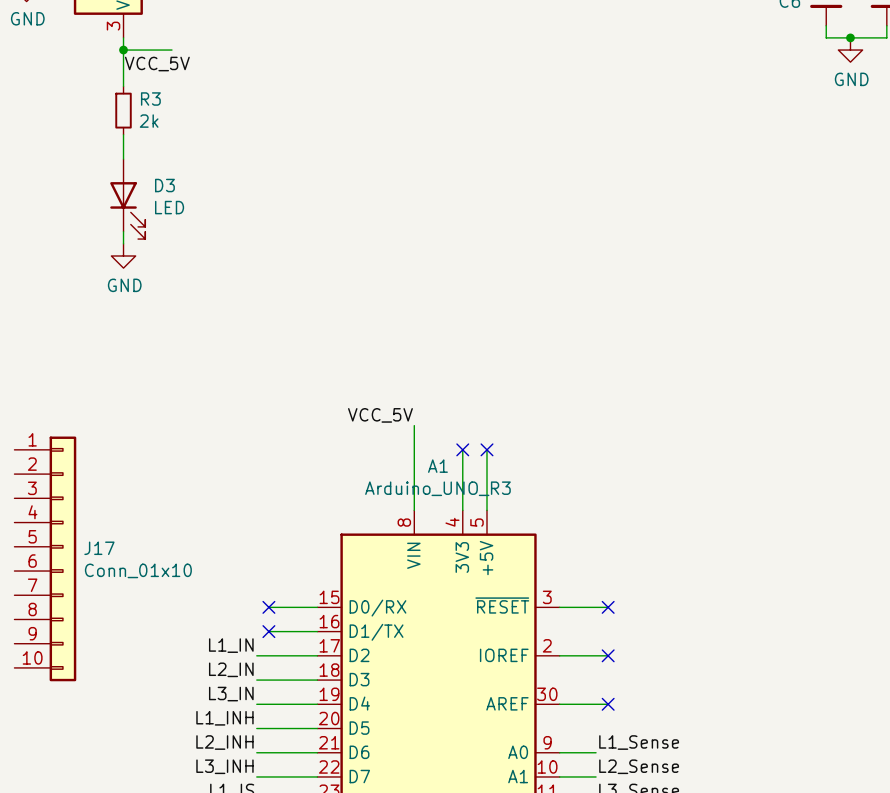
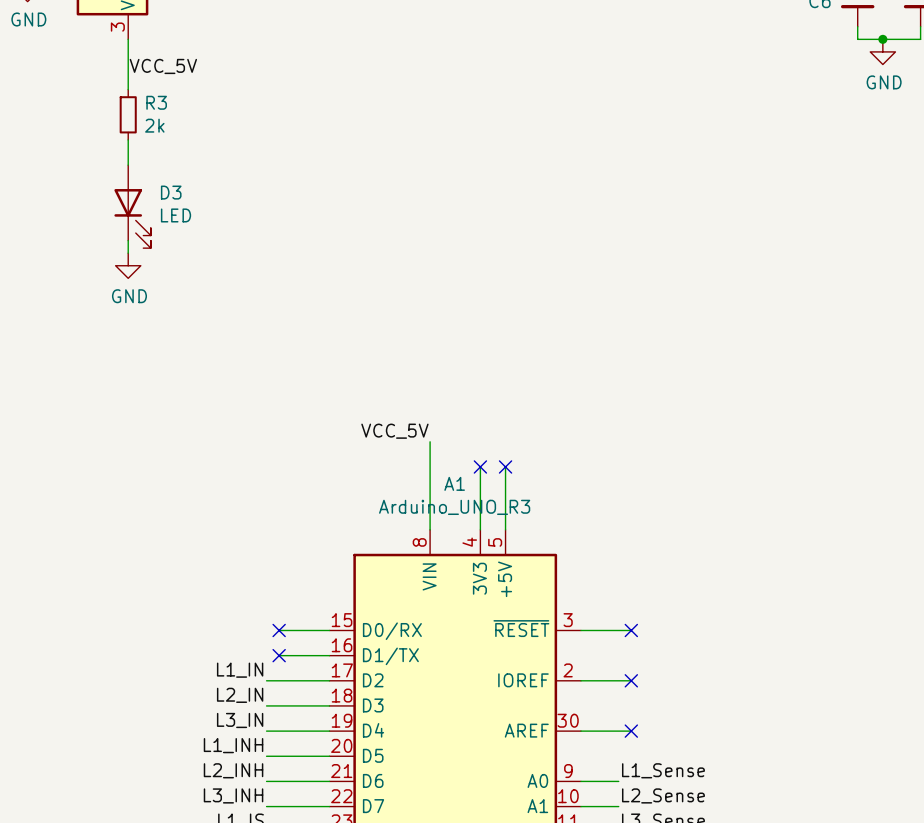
wire: (123, 50) (171, 50) -> none
junction: (123, 50) -> none
J17: Conn_01x10 (45, 558) -> none

